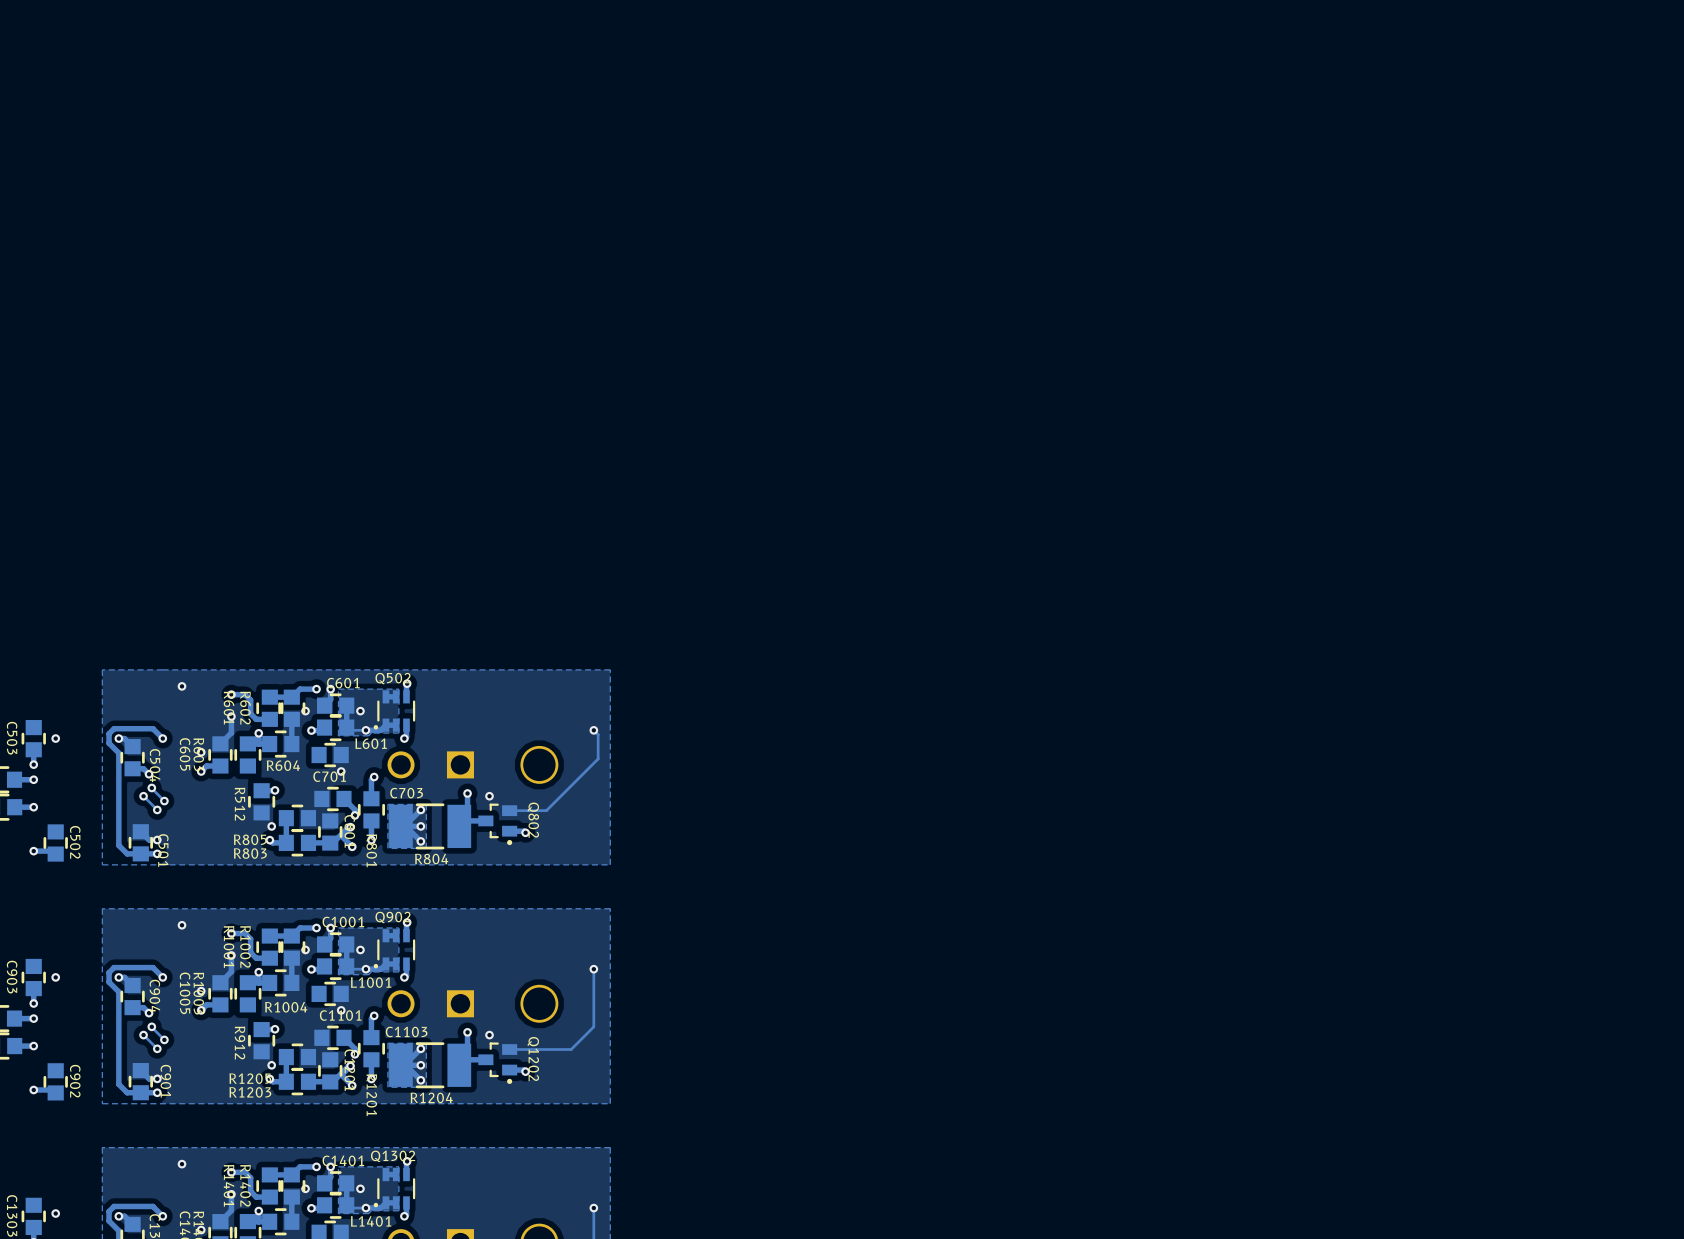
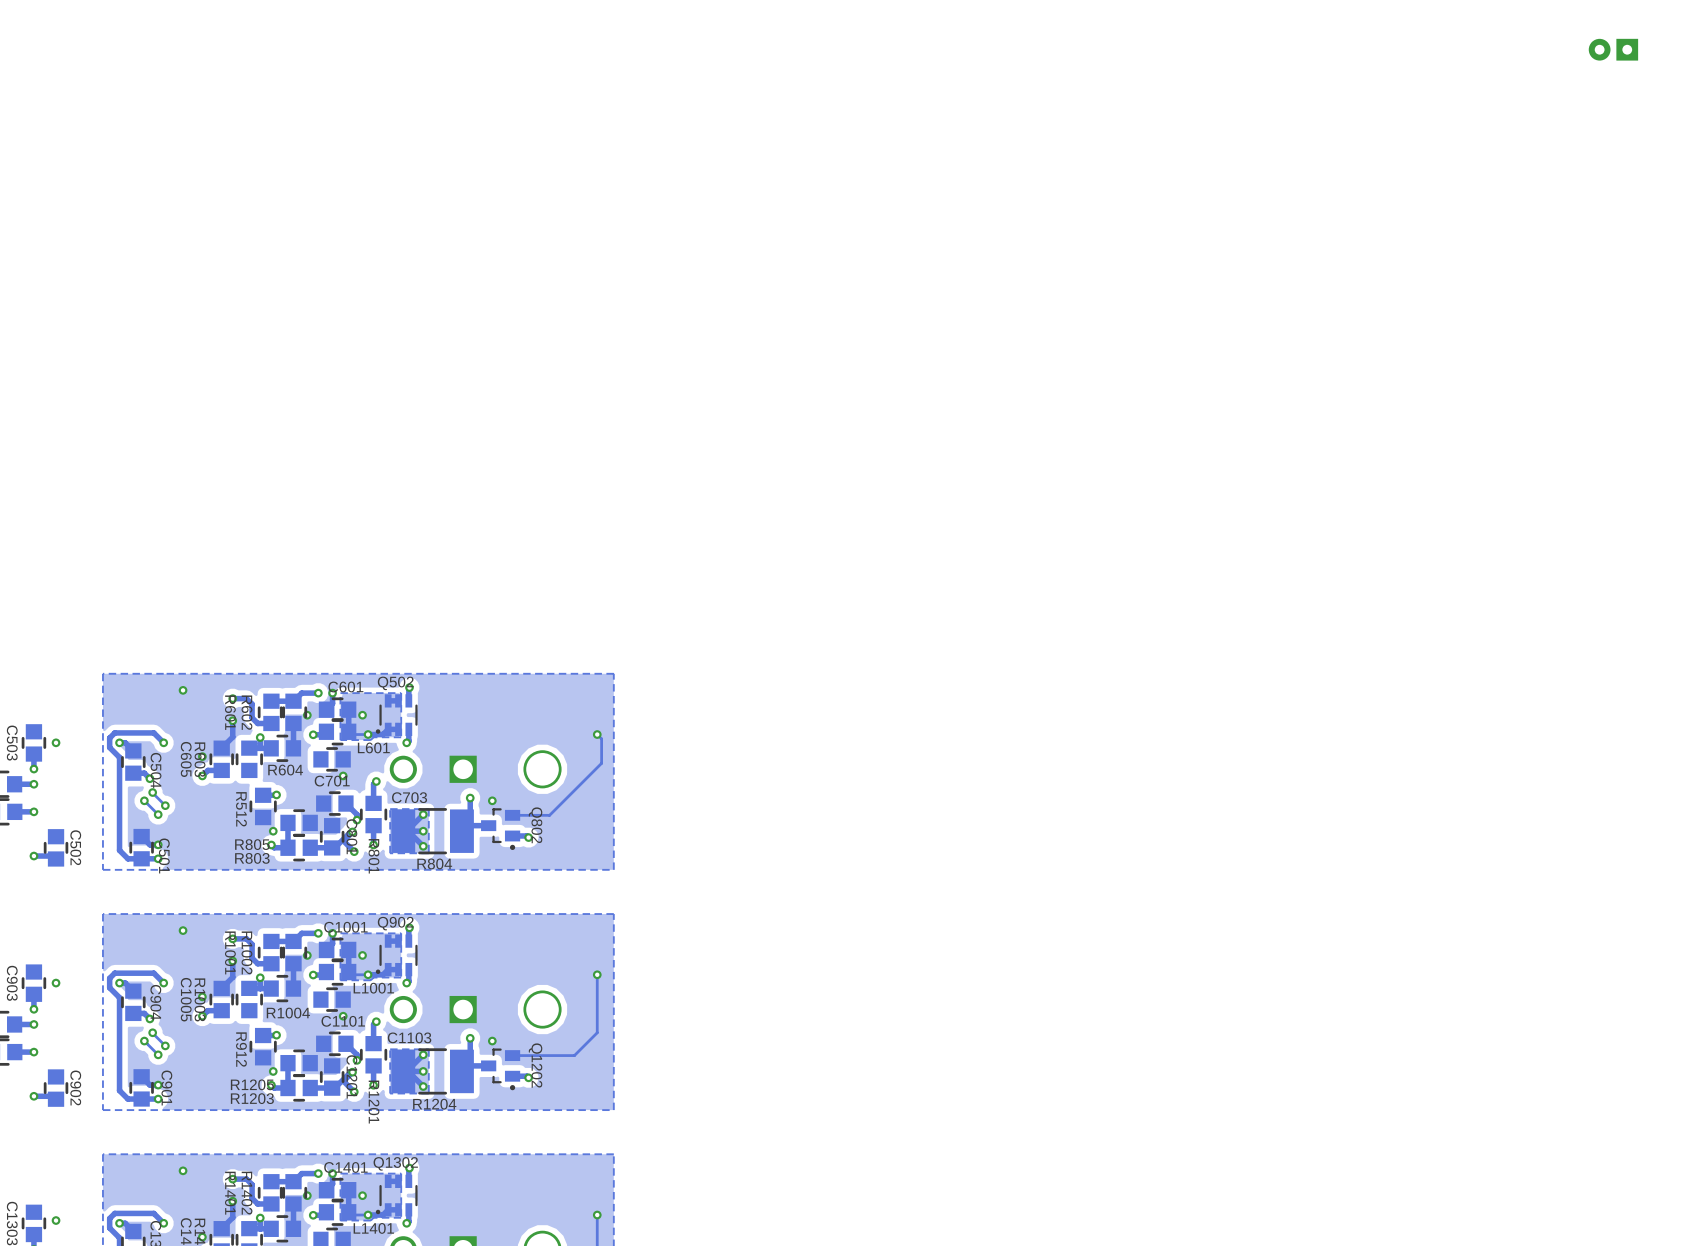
part: none -> (1613, 49)

